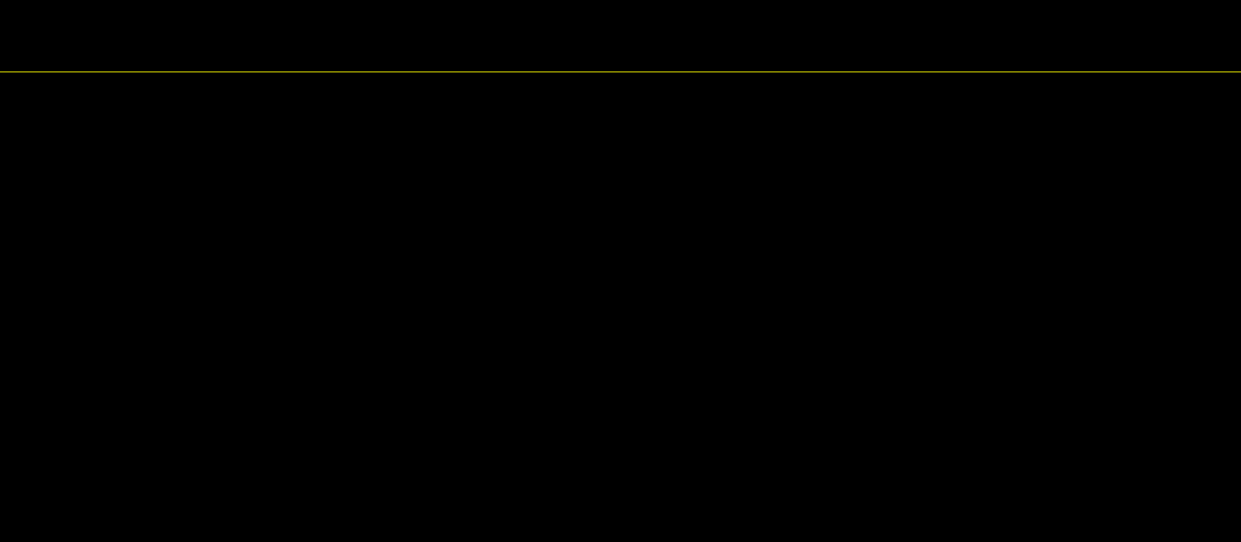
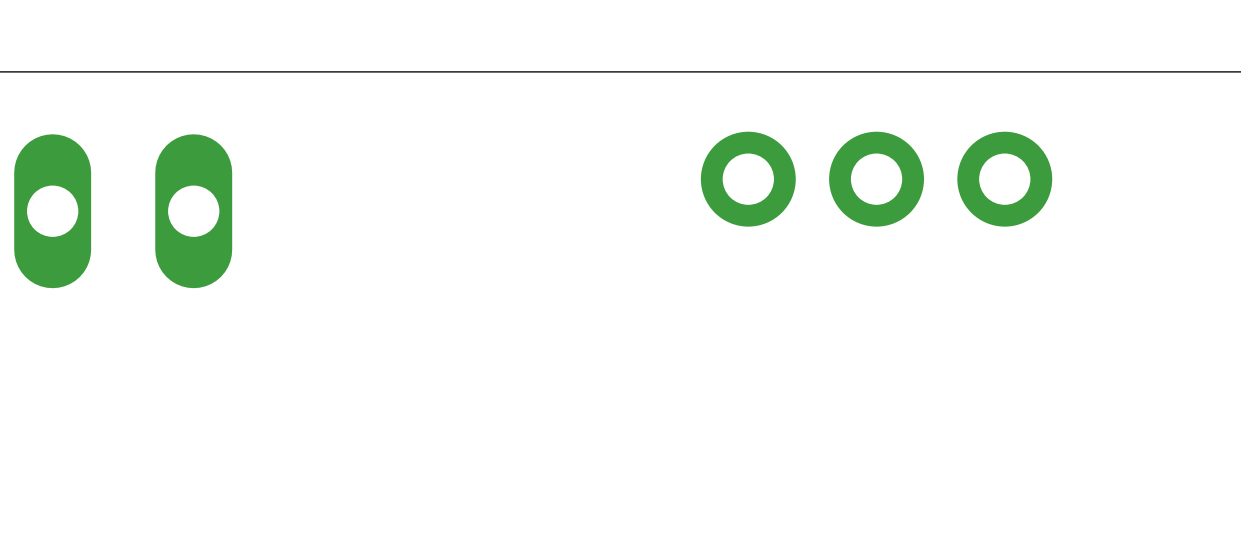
part: none -> (876, 179)
part: none -> (123, 211)

